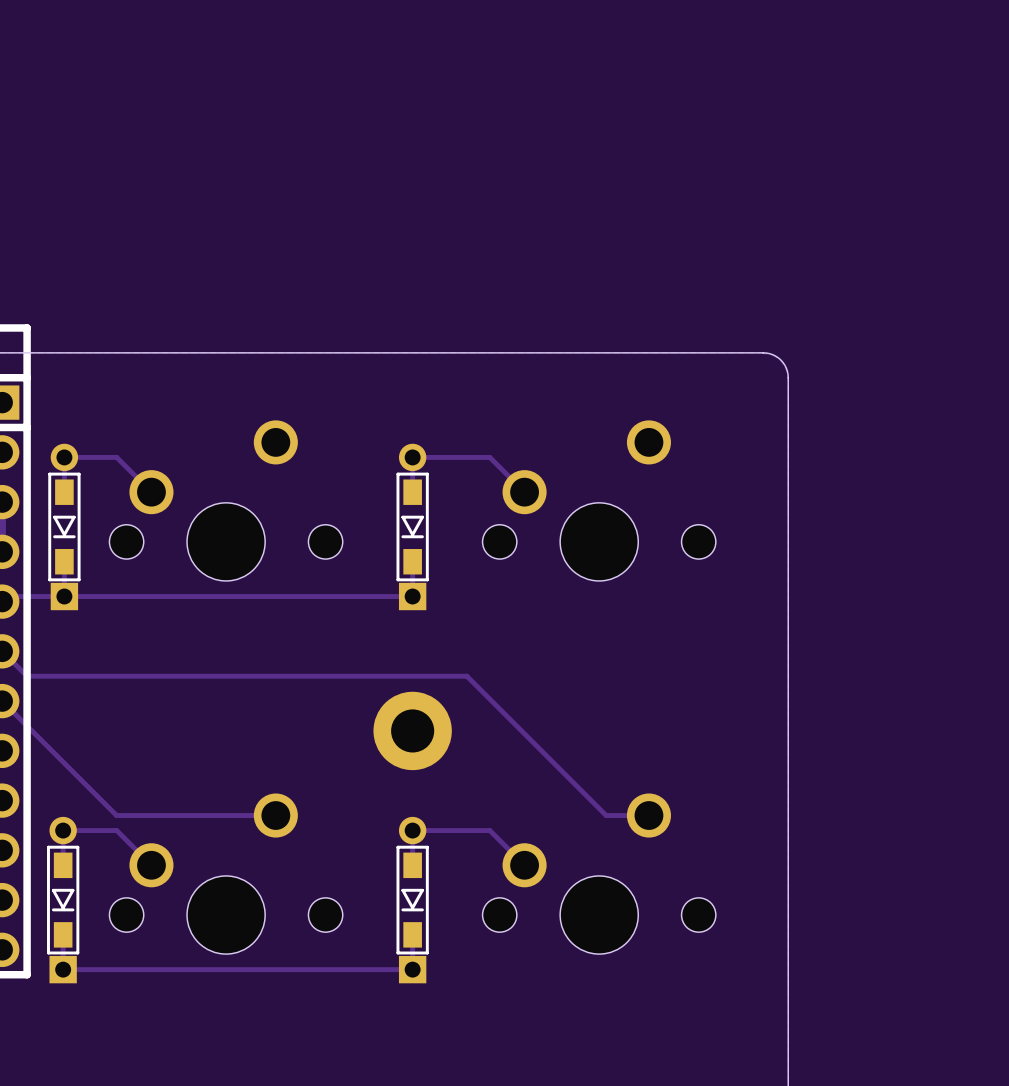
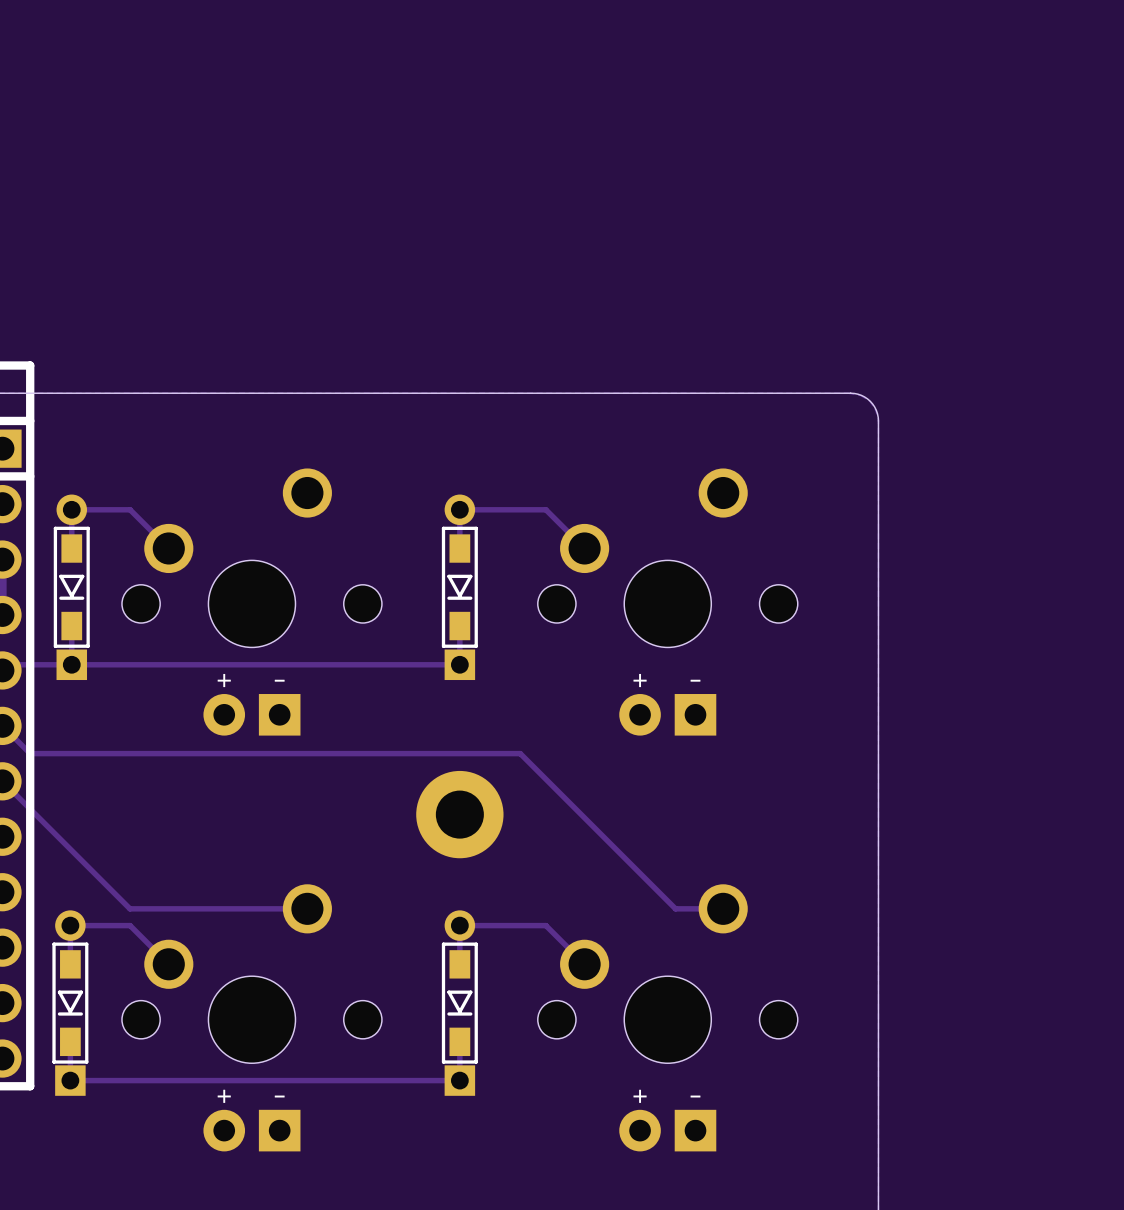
part: none -> (251, 602)
part: none -> (667, 602)
part: none -> (251, 1017)
part: none -> (667, 1017)

